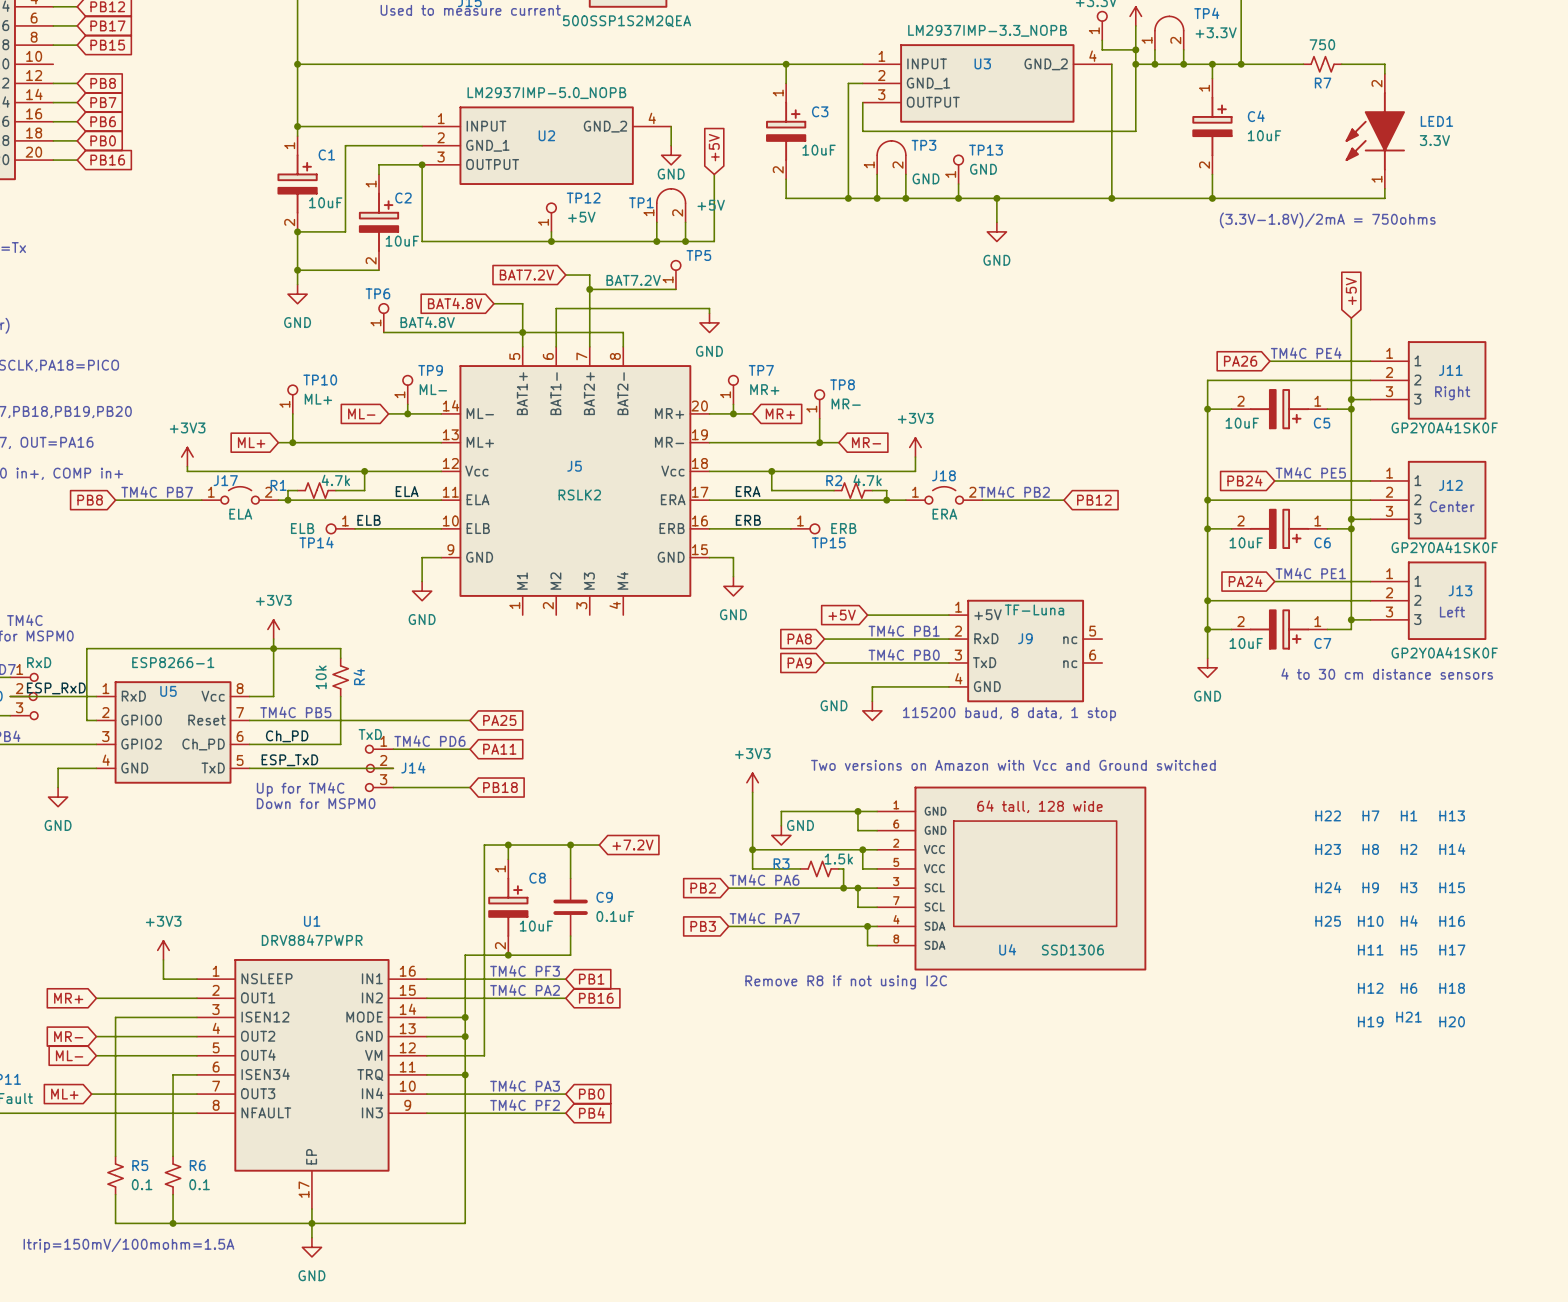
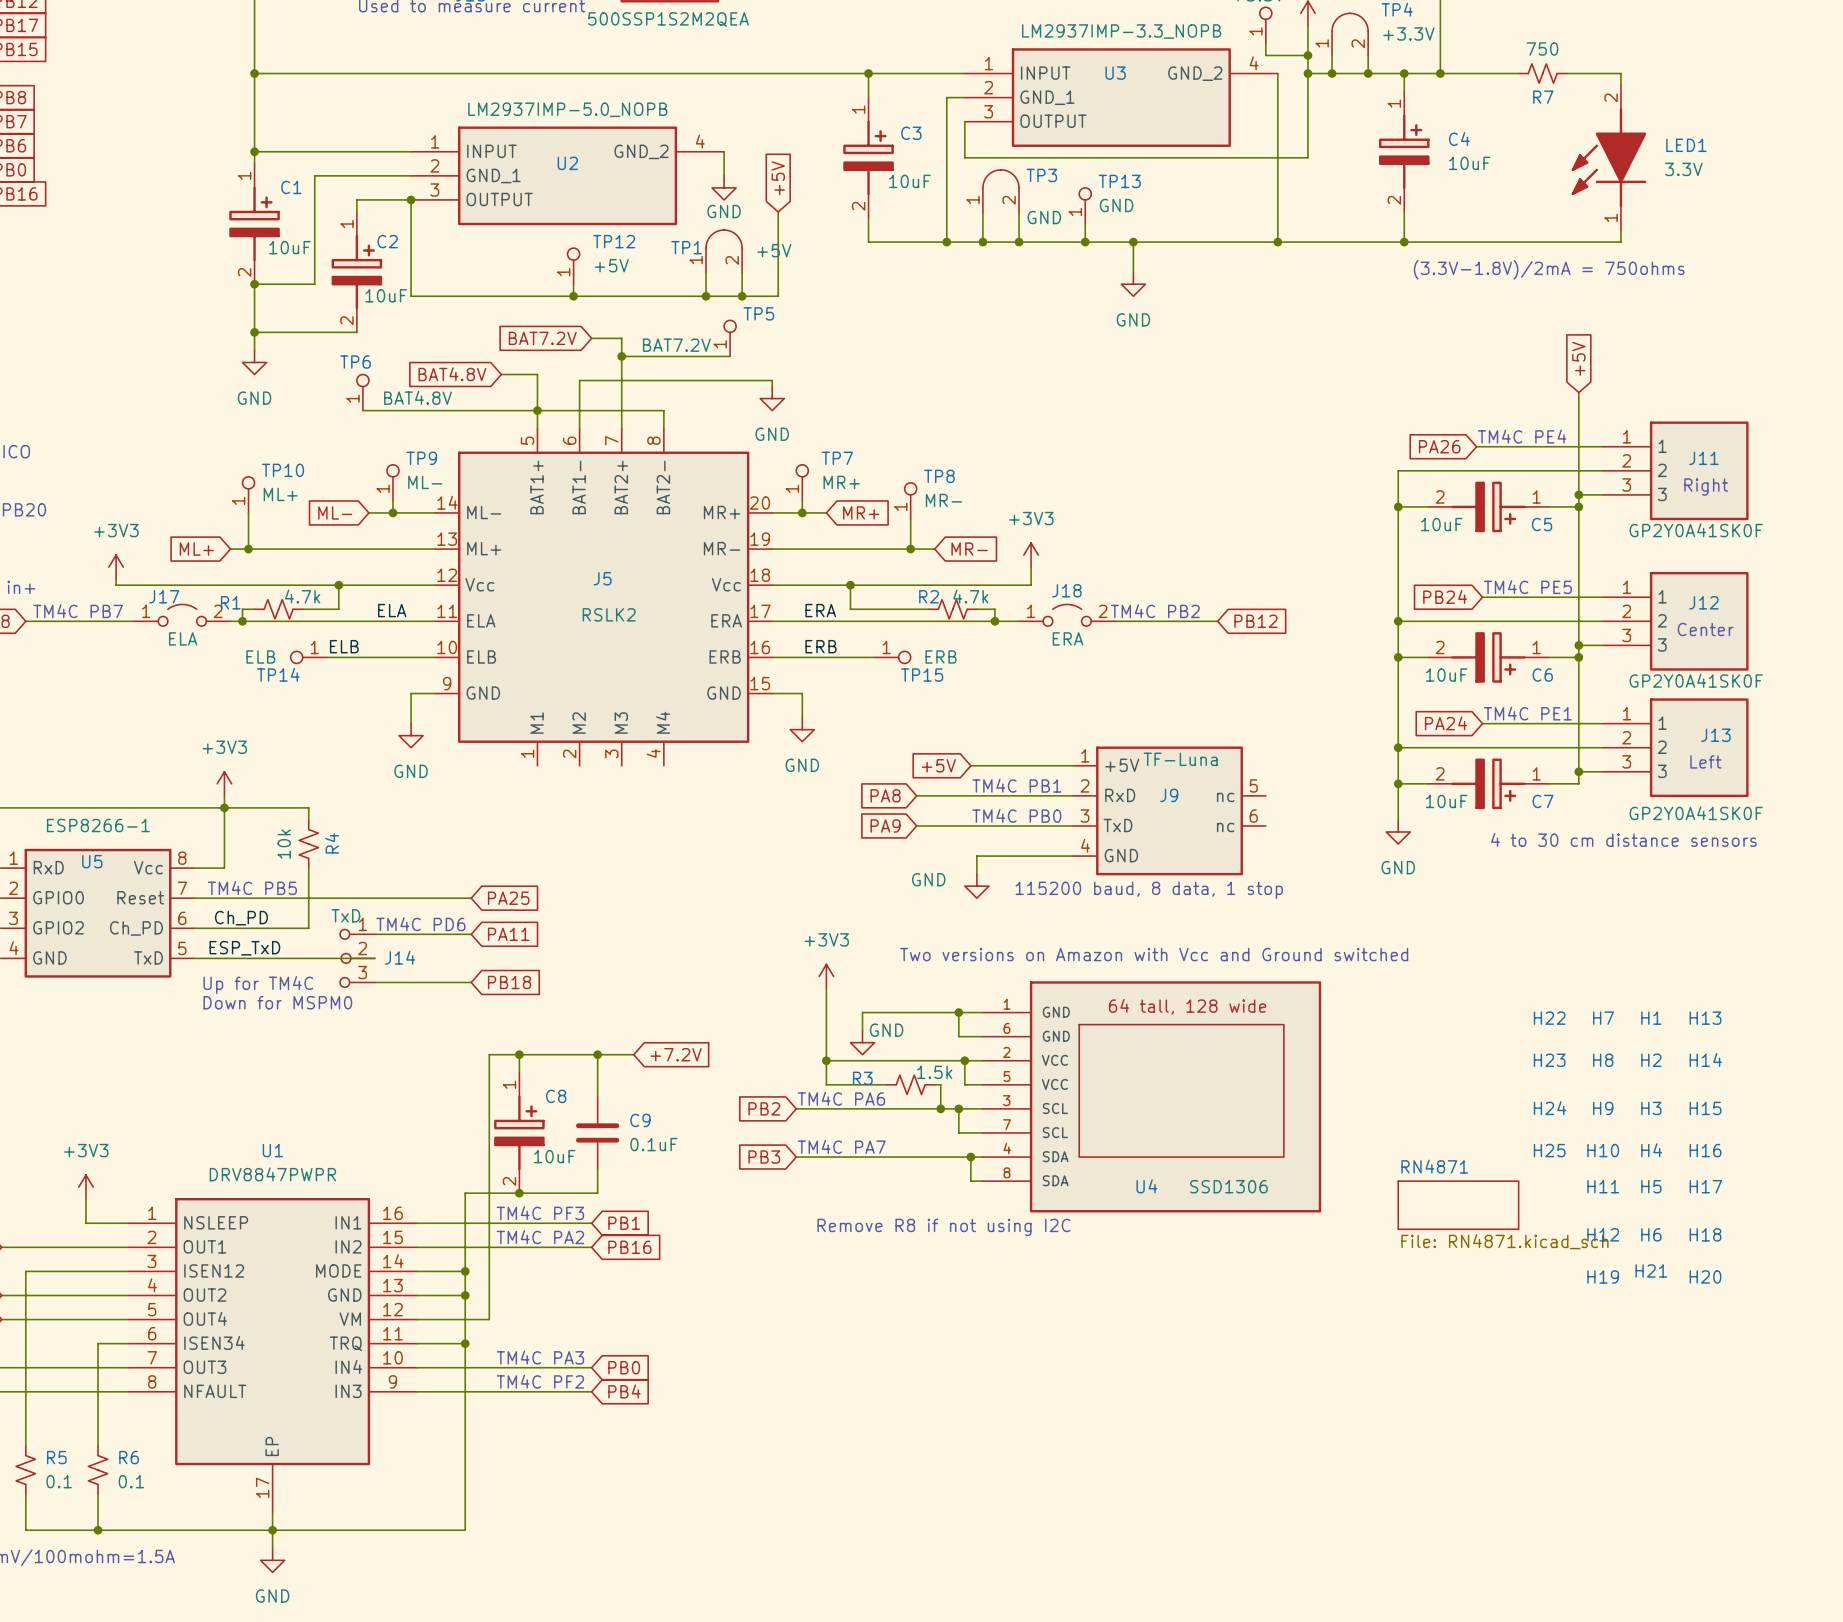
sheet RN4871: none -> File: RN4871.kicad_sch (1458, 1205)

